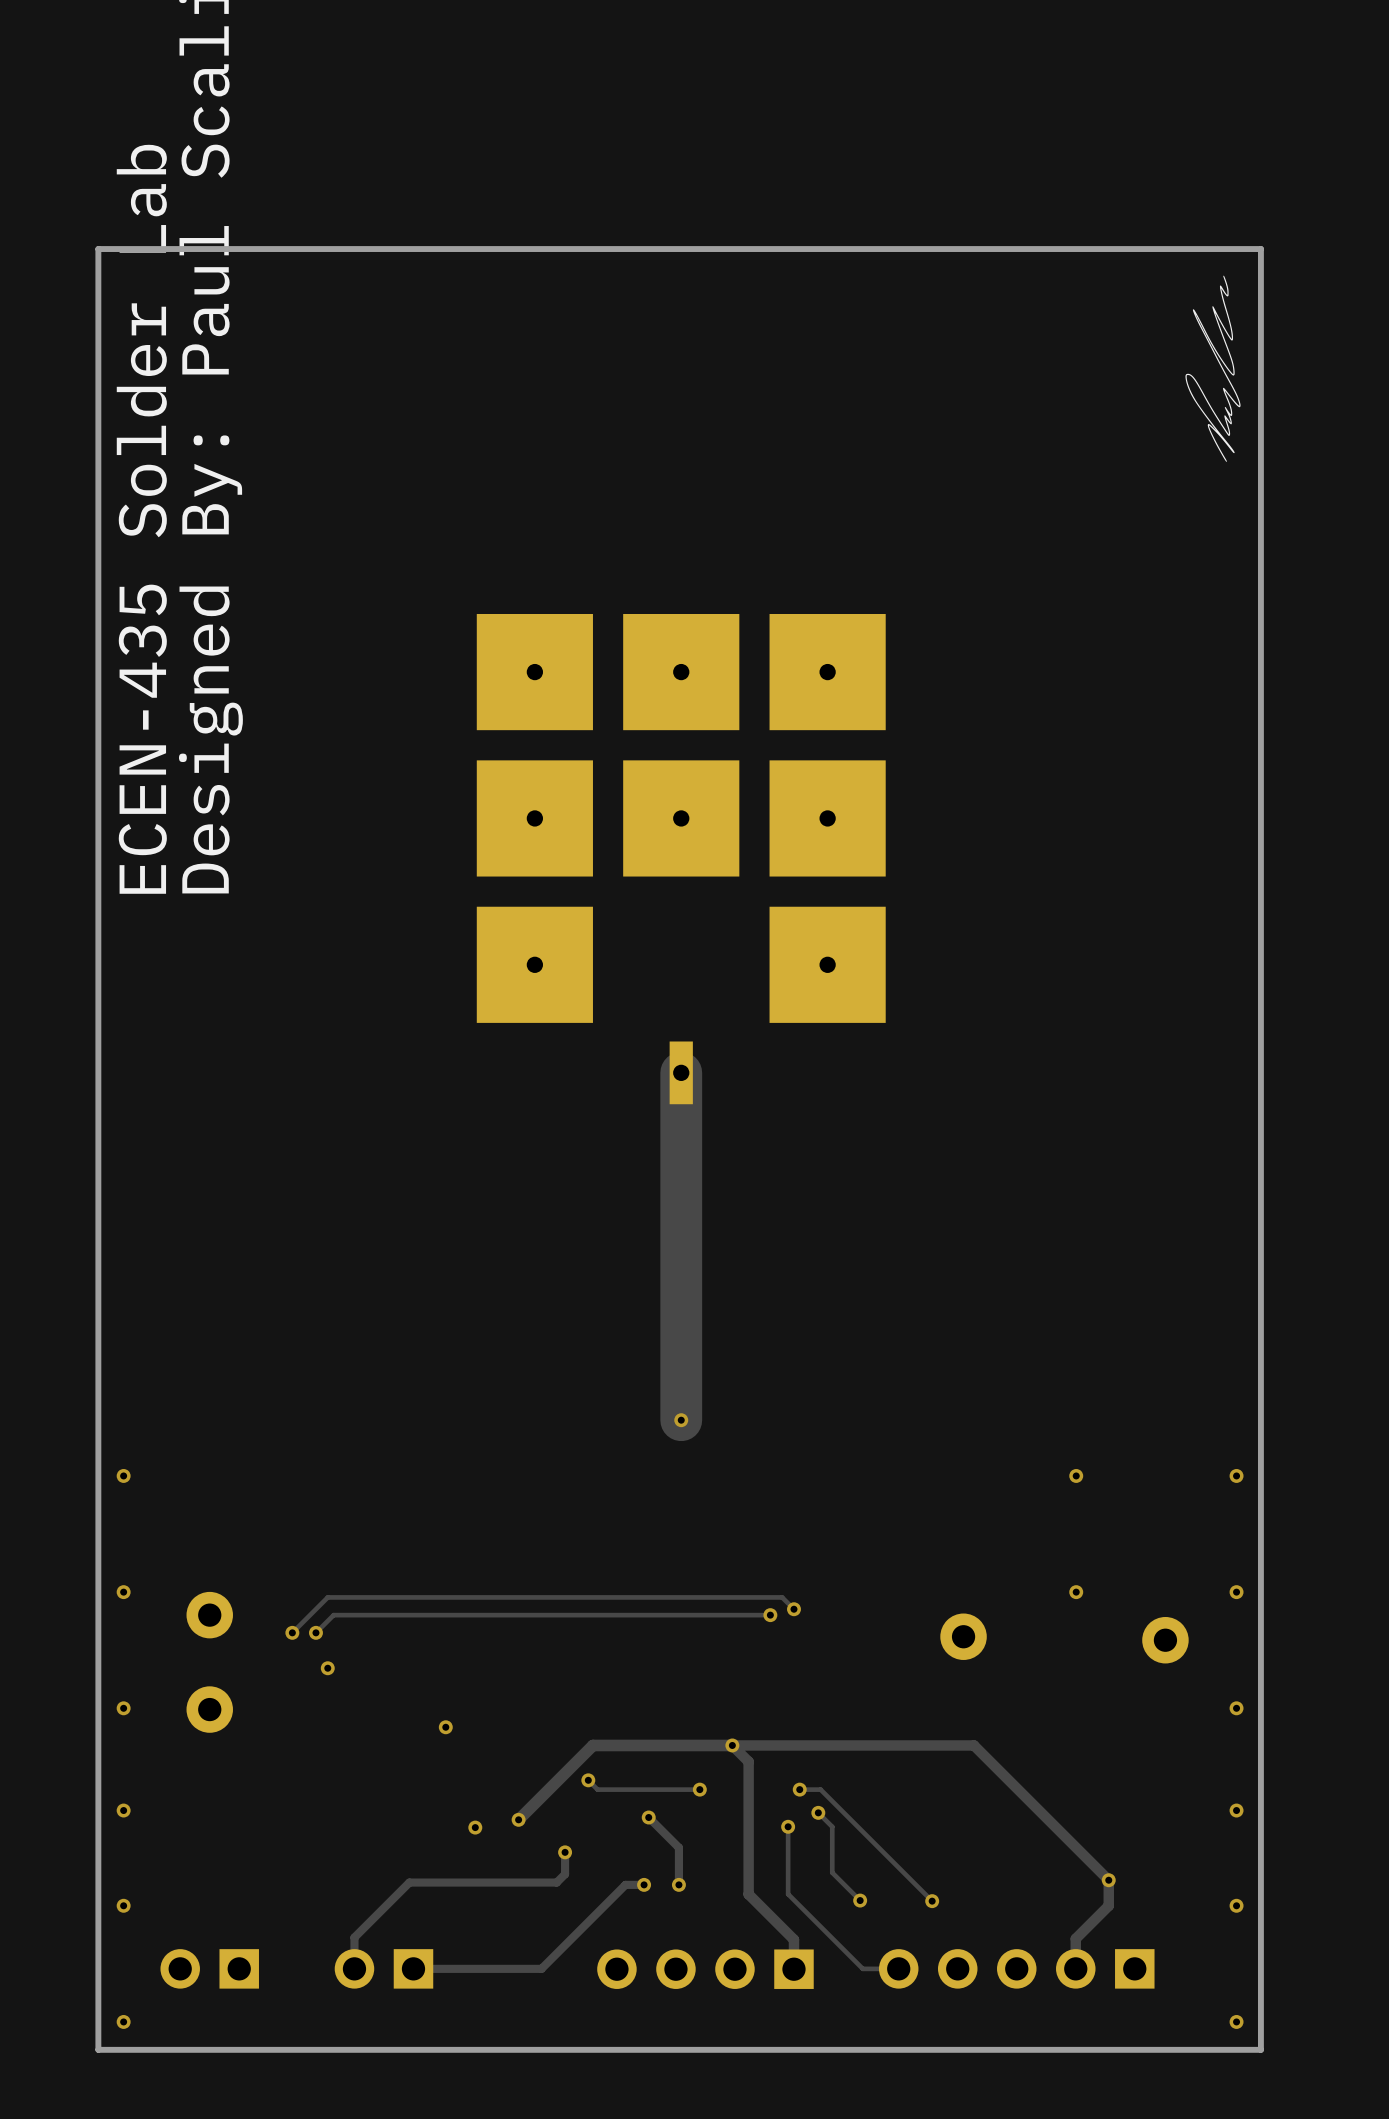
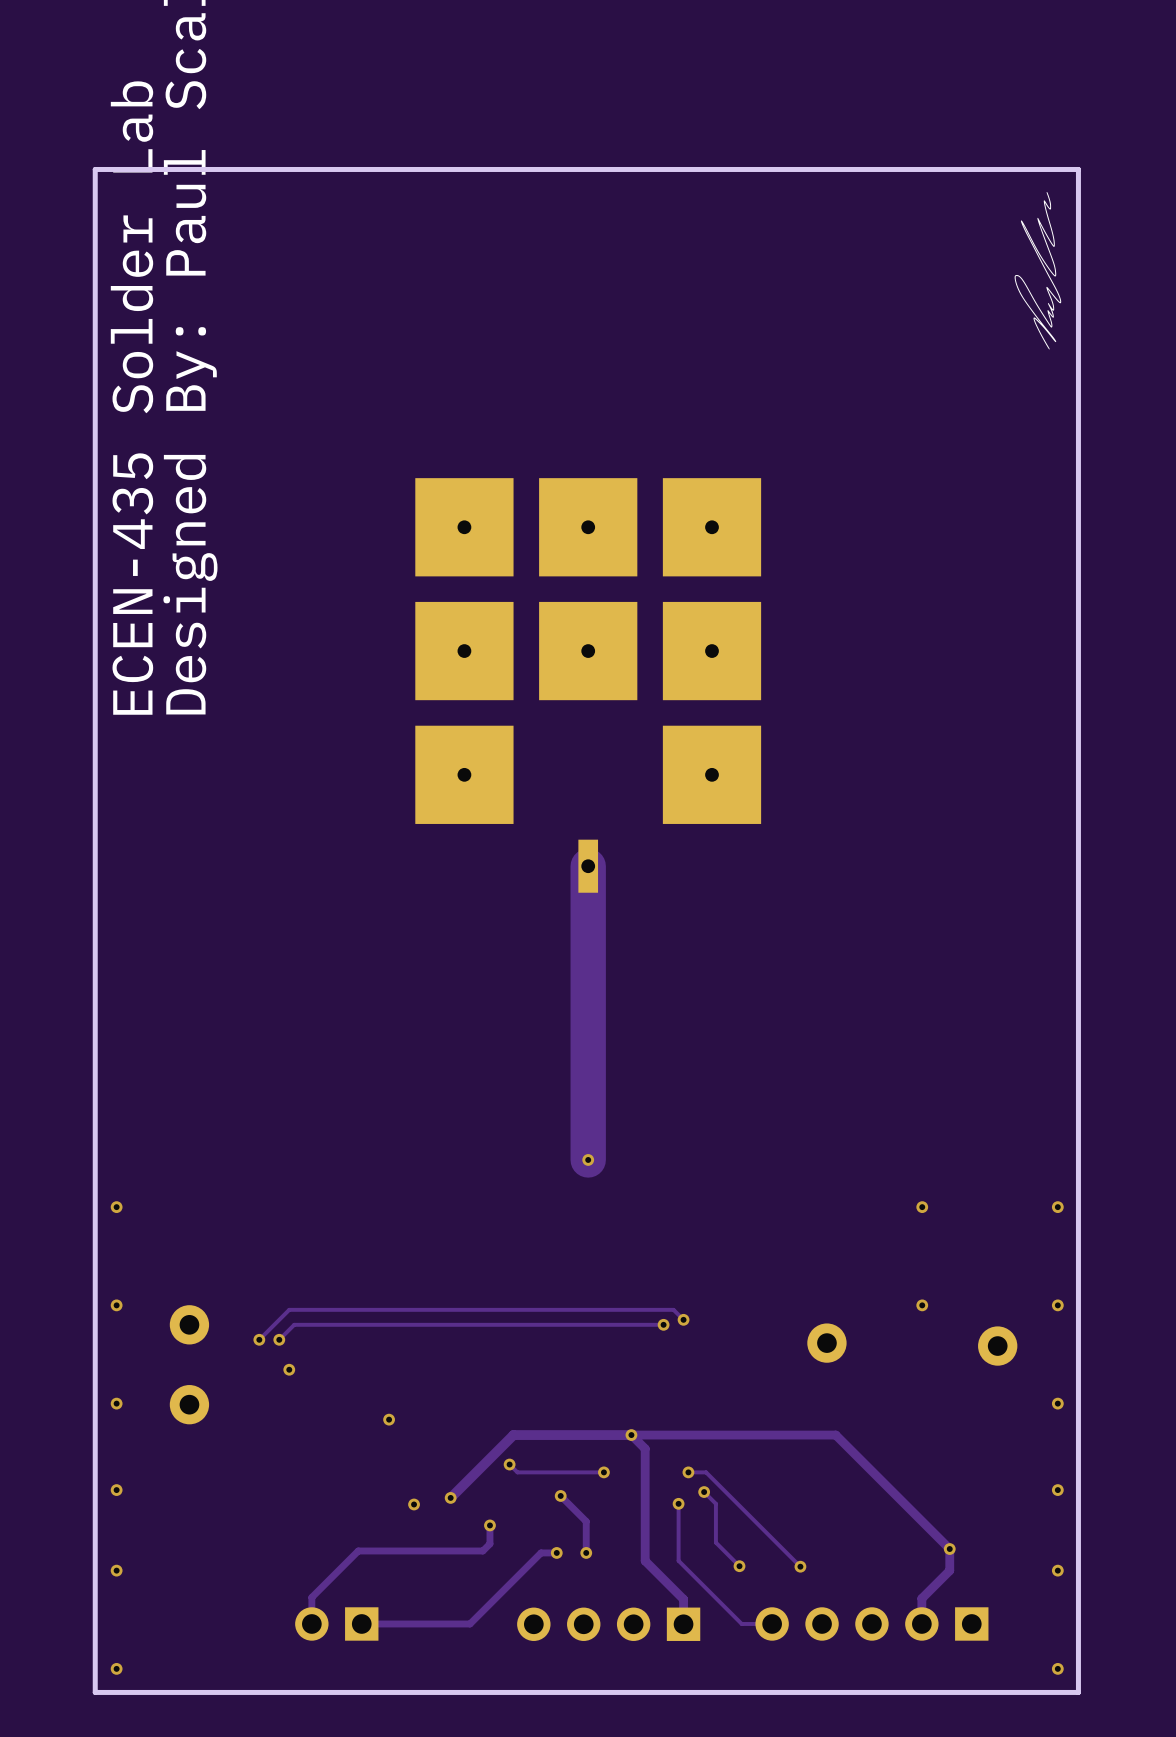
part: (209, 1968) -> none

